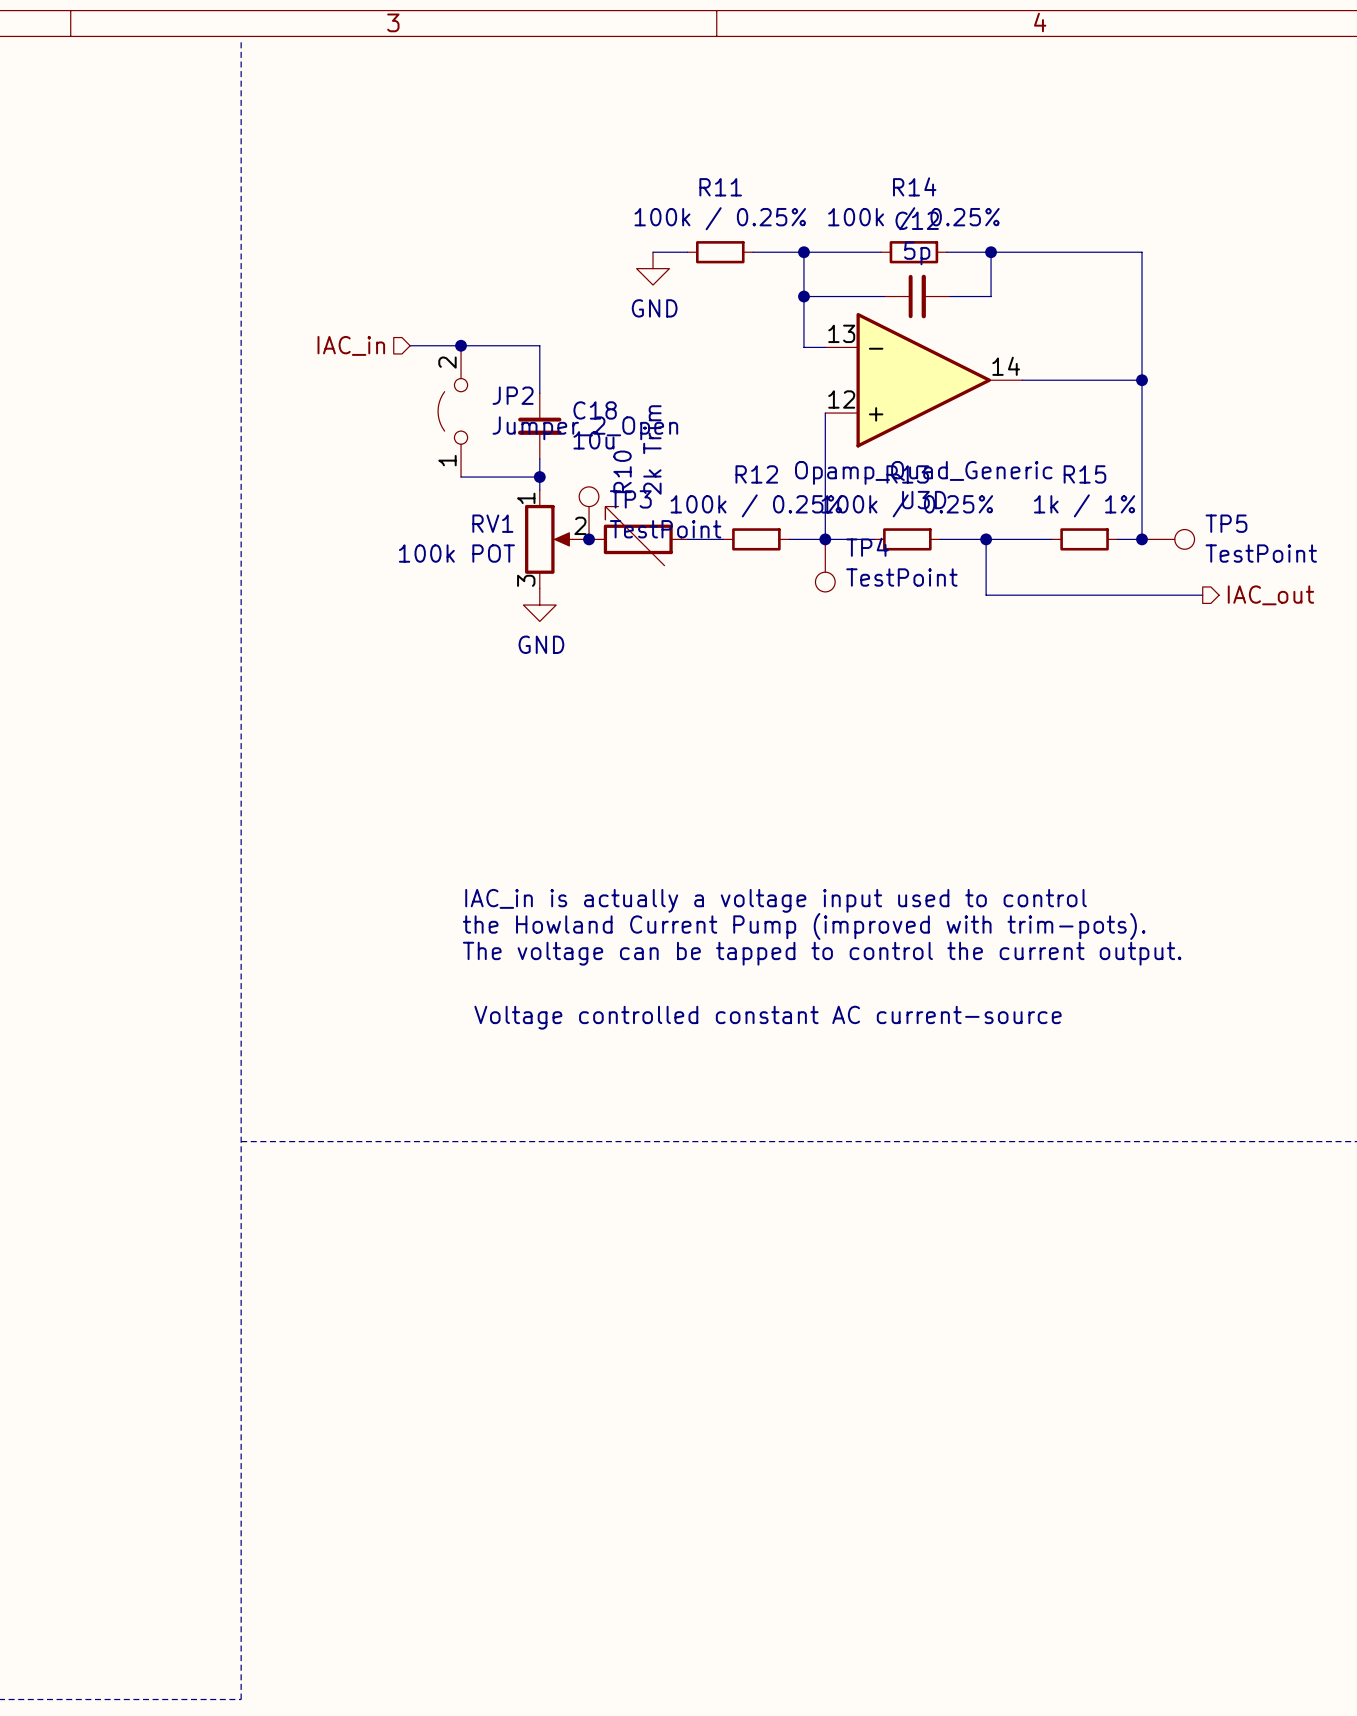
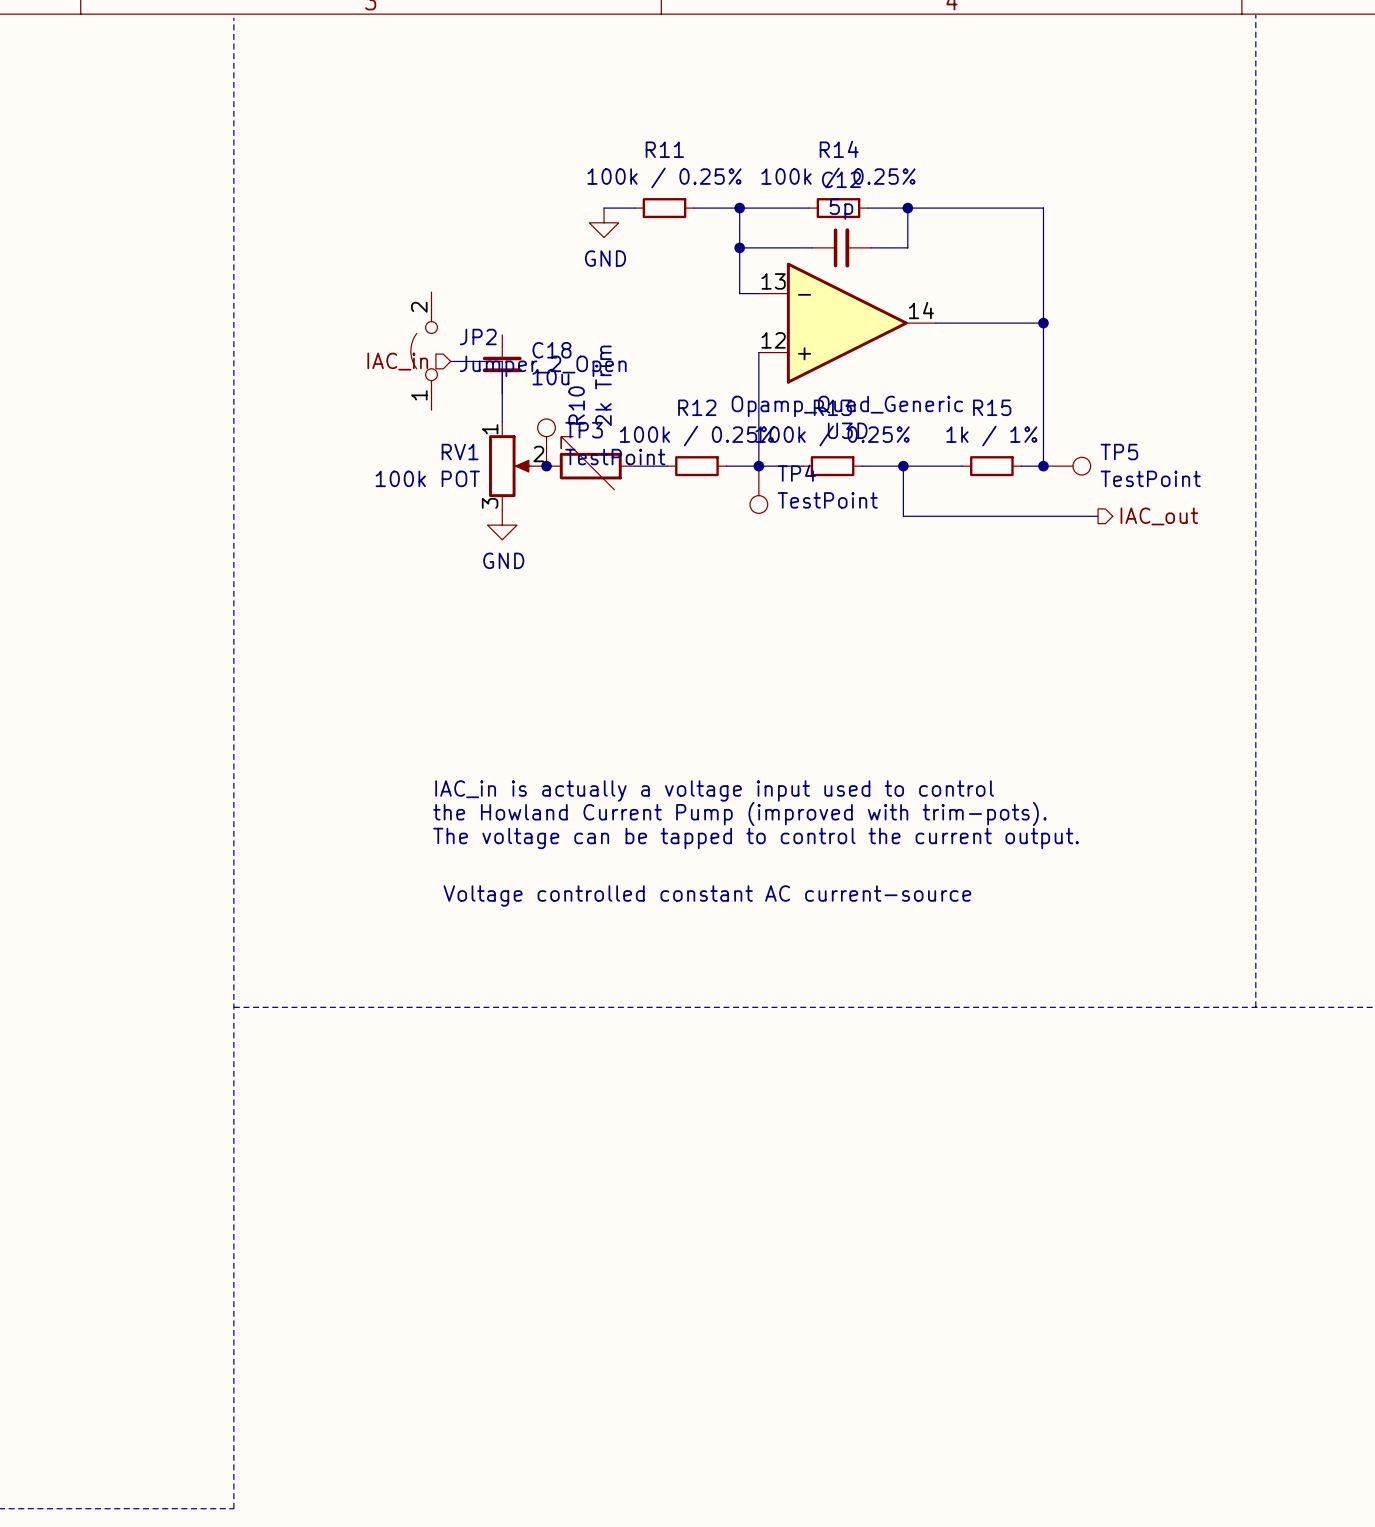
hierarchical label position: IAC_in (351, 345) -> IAC_in (397, 361)
wire: (410, 345) (539, 345) (539, 393) -> none
junction: (461, 345) -> none
wire: none -> (450, 361) (502, 361) (502, 393)
wire: (461, 477) (539, 477) -> none
junction: (539, 477) -> none

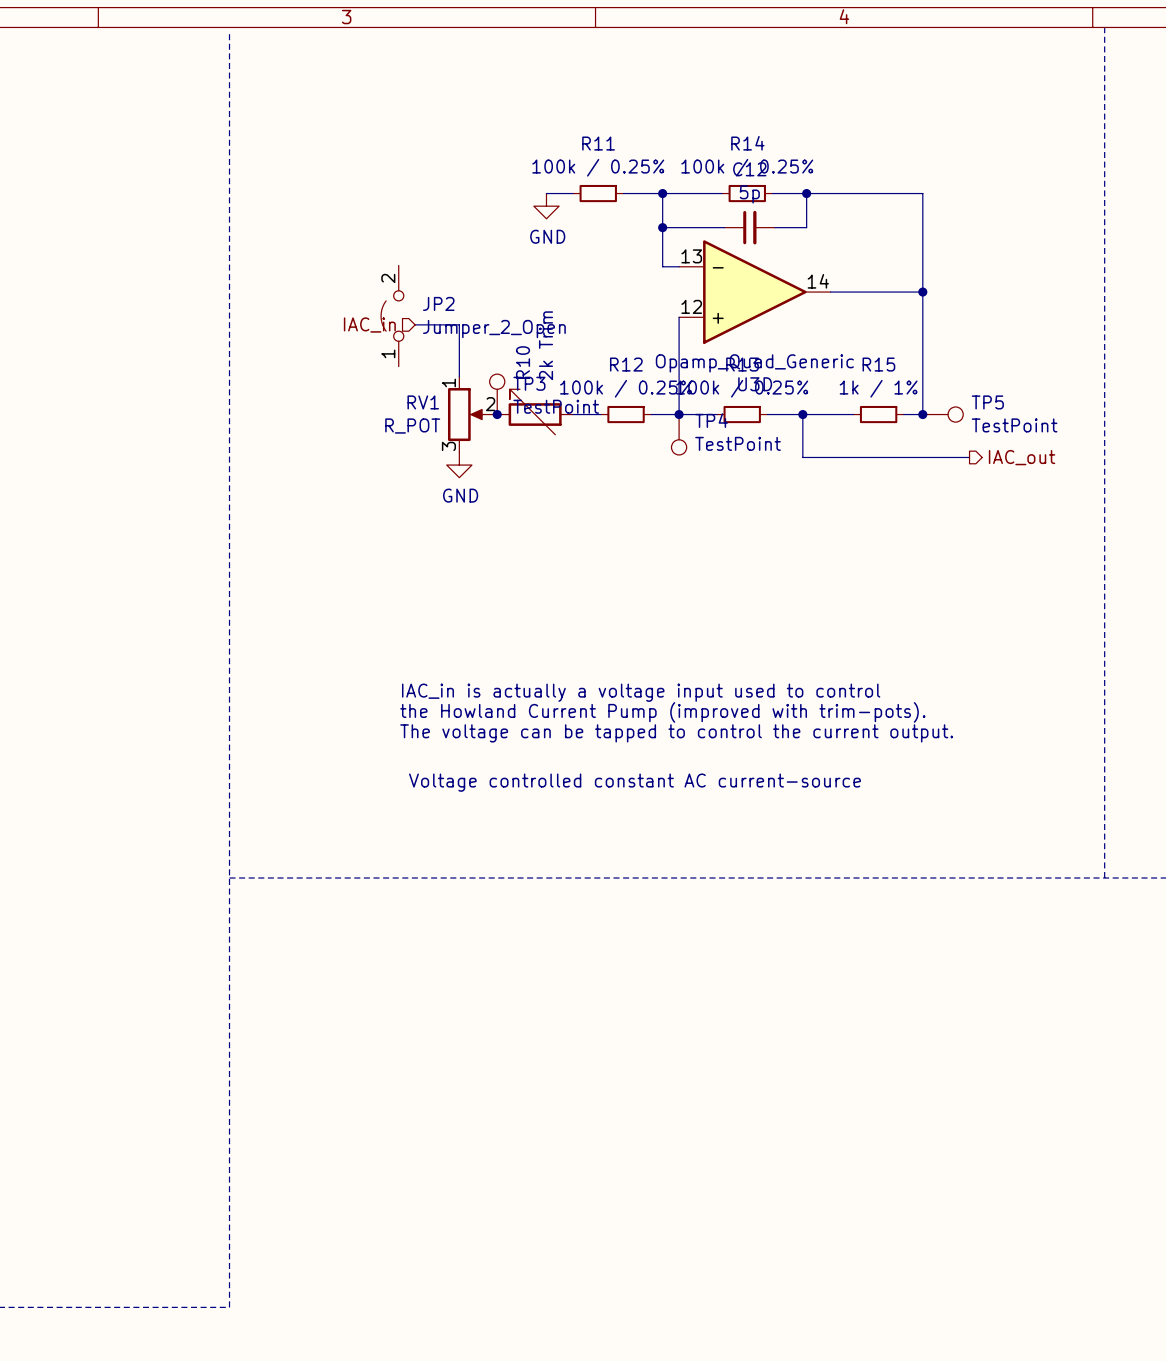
C18: 10u (502, 364) -> none
RV1 value: 100k POT (427, 478) -> R_POT (412, 426)

